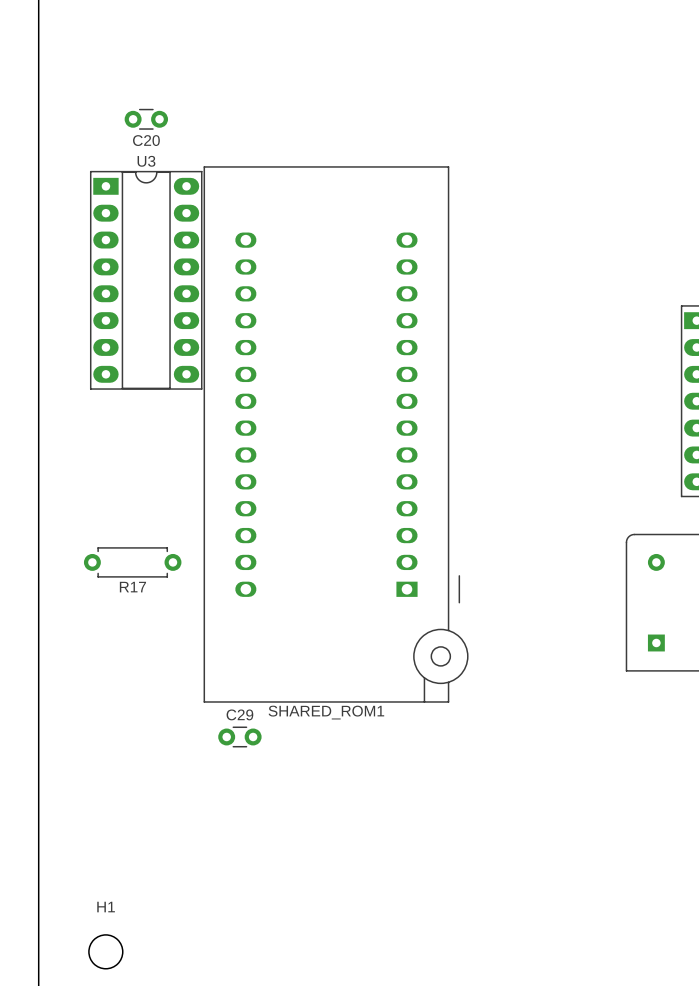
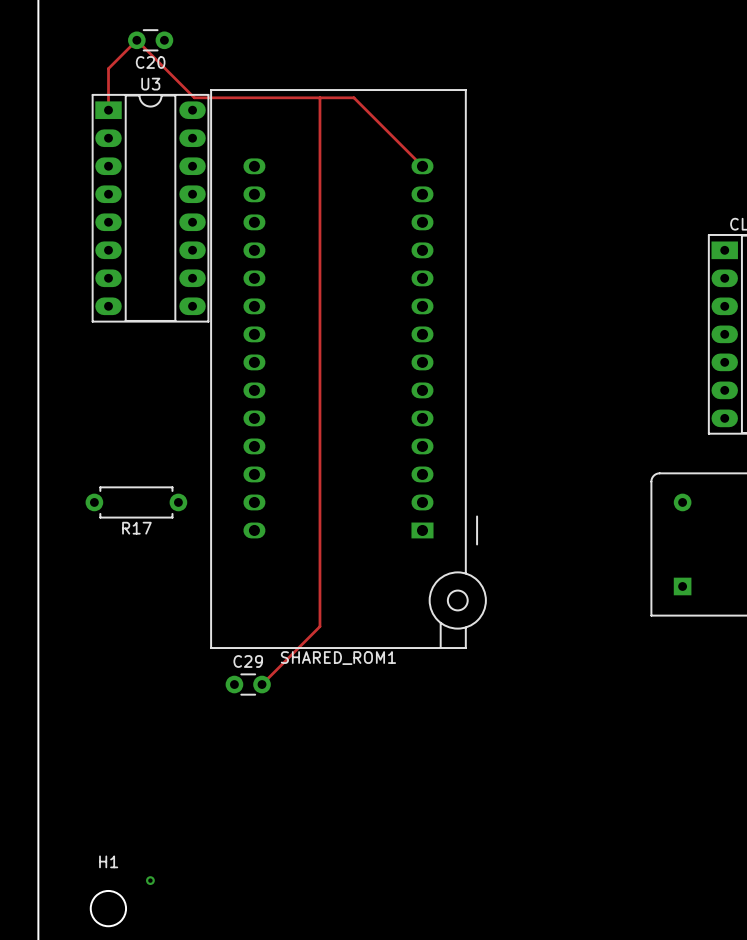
top track: none -> (319, 97) (319, 626) (262, 684)
top track: none -> (108, 110) (108, 68) (136, 40) (194, 97) (353, 97) (422, 166)
via: none -> (150, 880)

